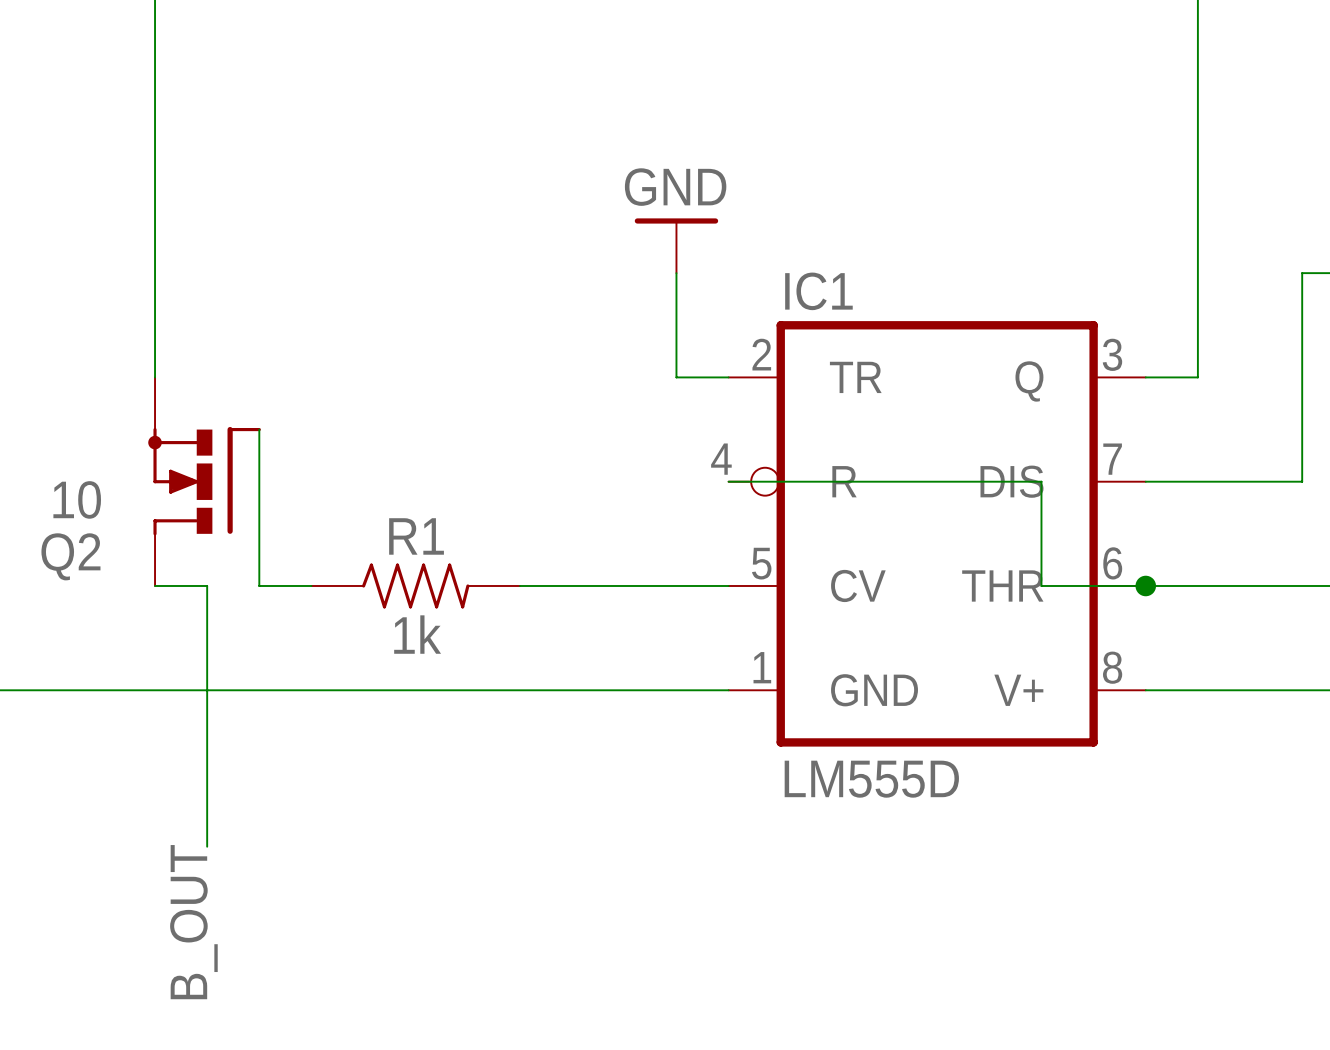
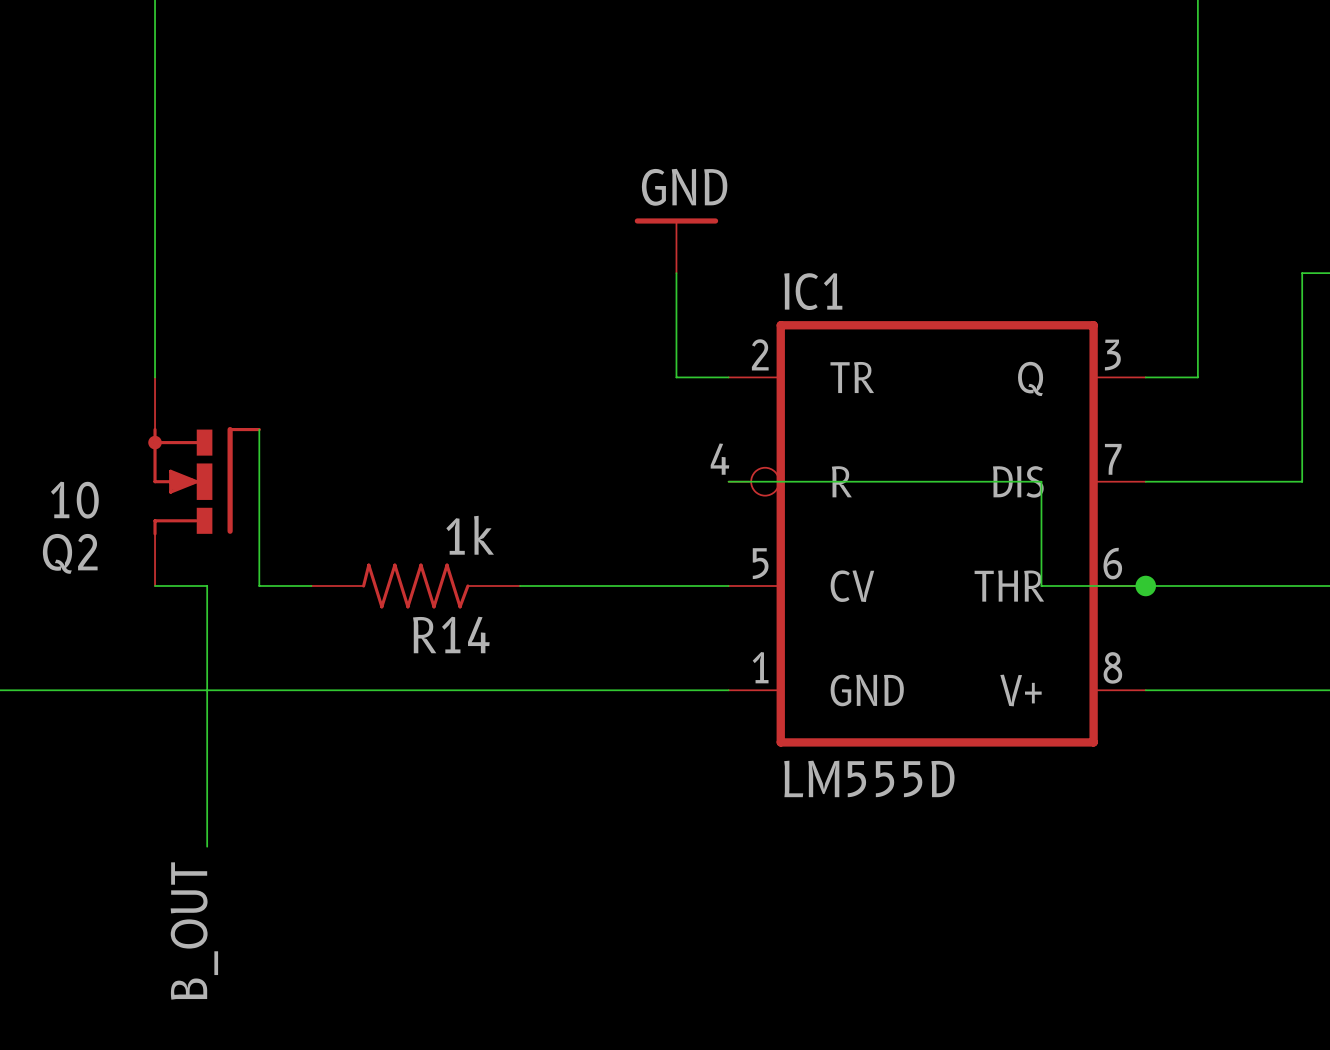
R1: 1k (415, 585) -> none
R14: none -> 1k (415, 585)

